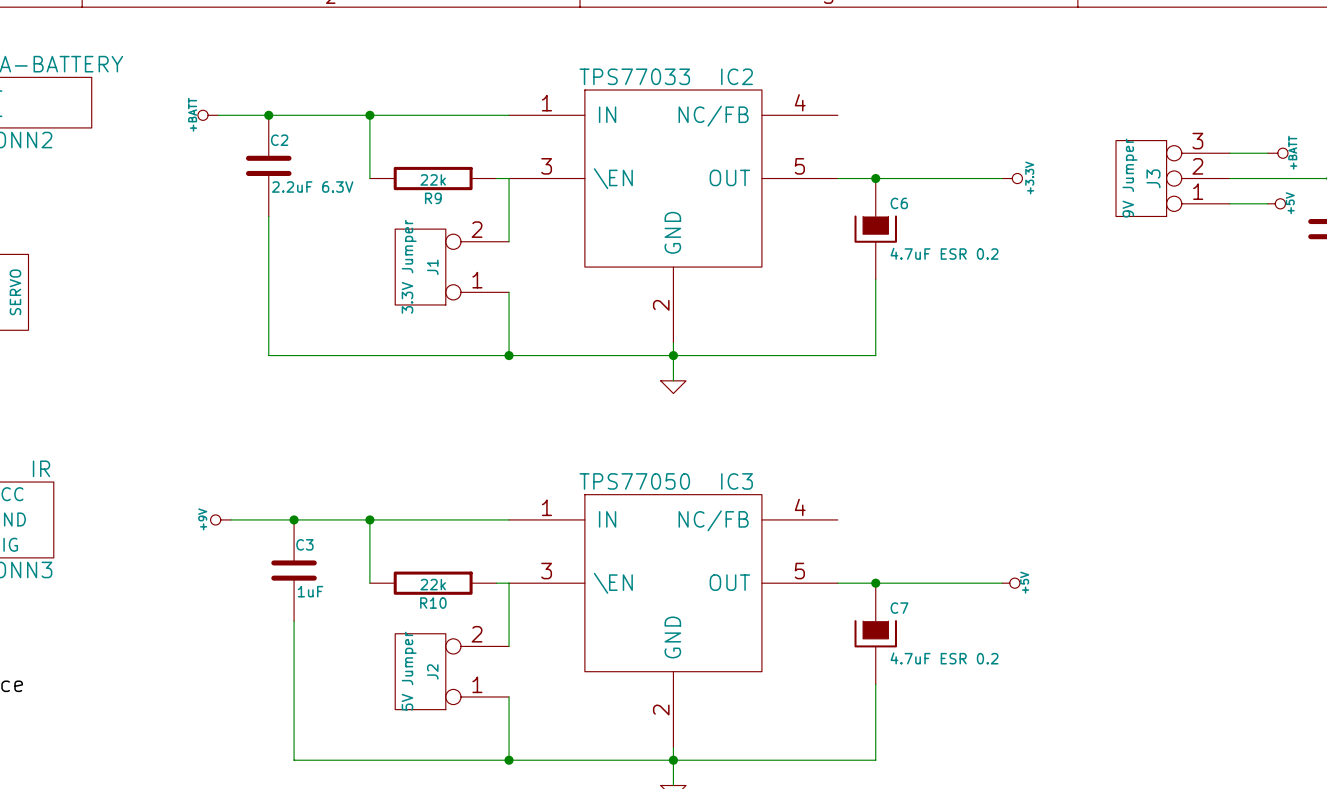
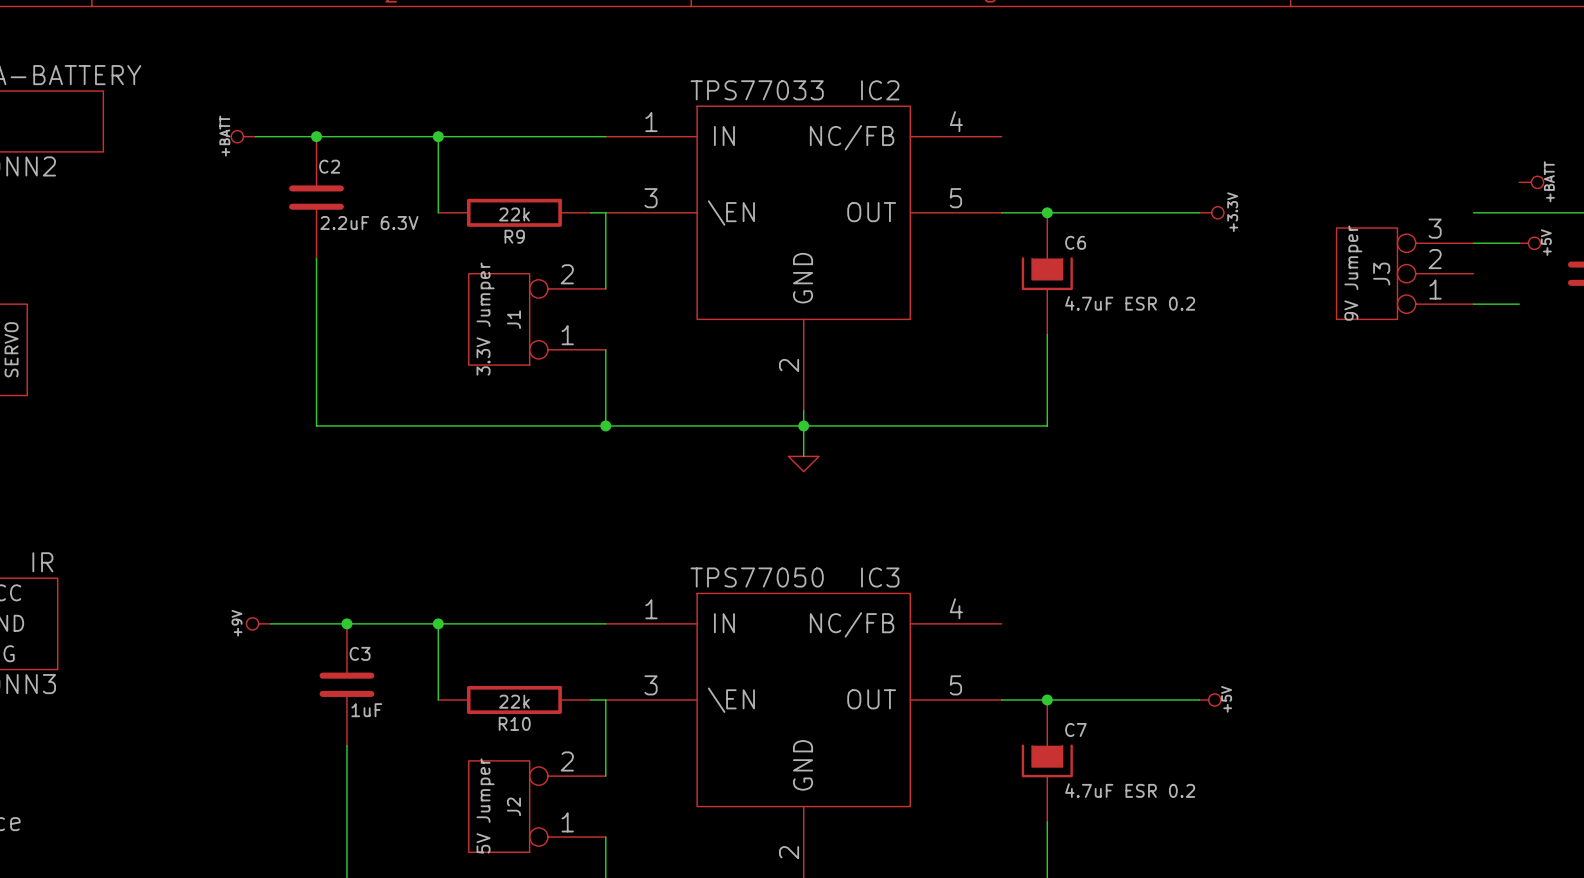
wire: (1229, 153) (1267, 153) -> (1473, 304) (1519, 304)
J3 position: (1172, 178) -> (1405, 273)

